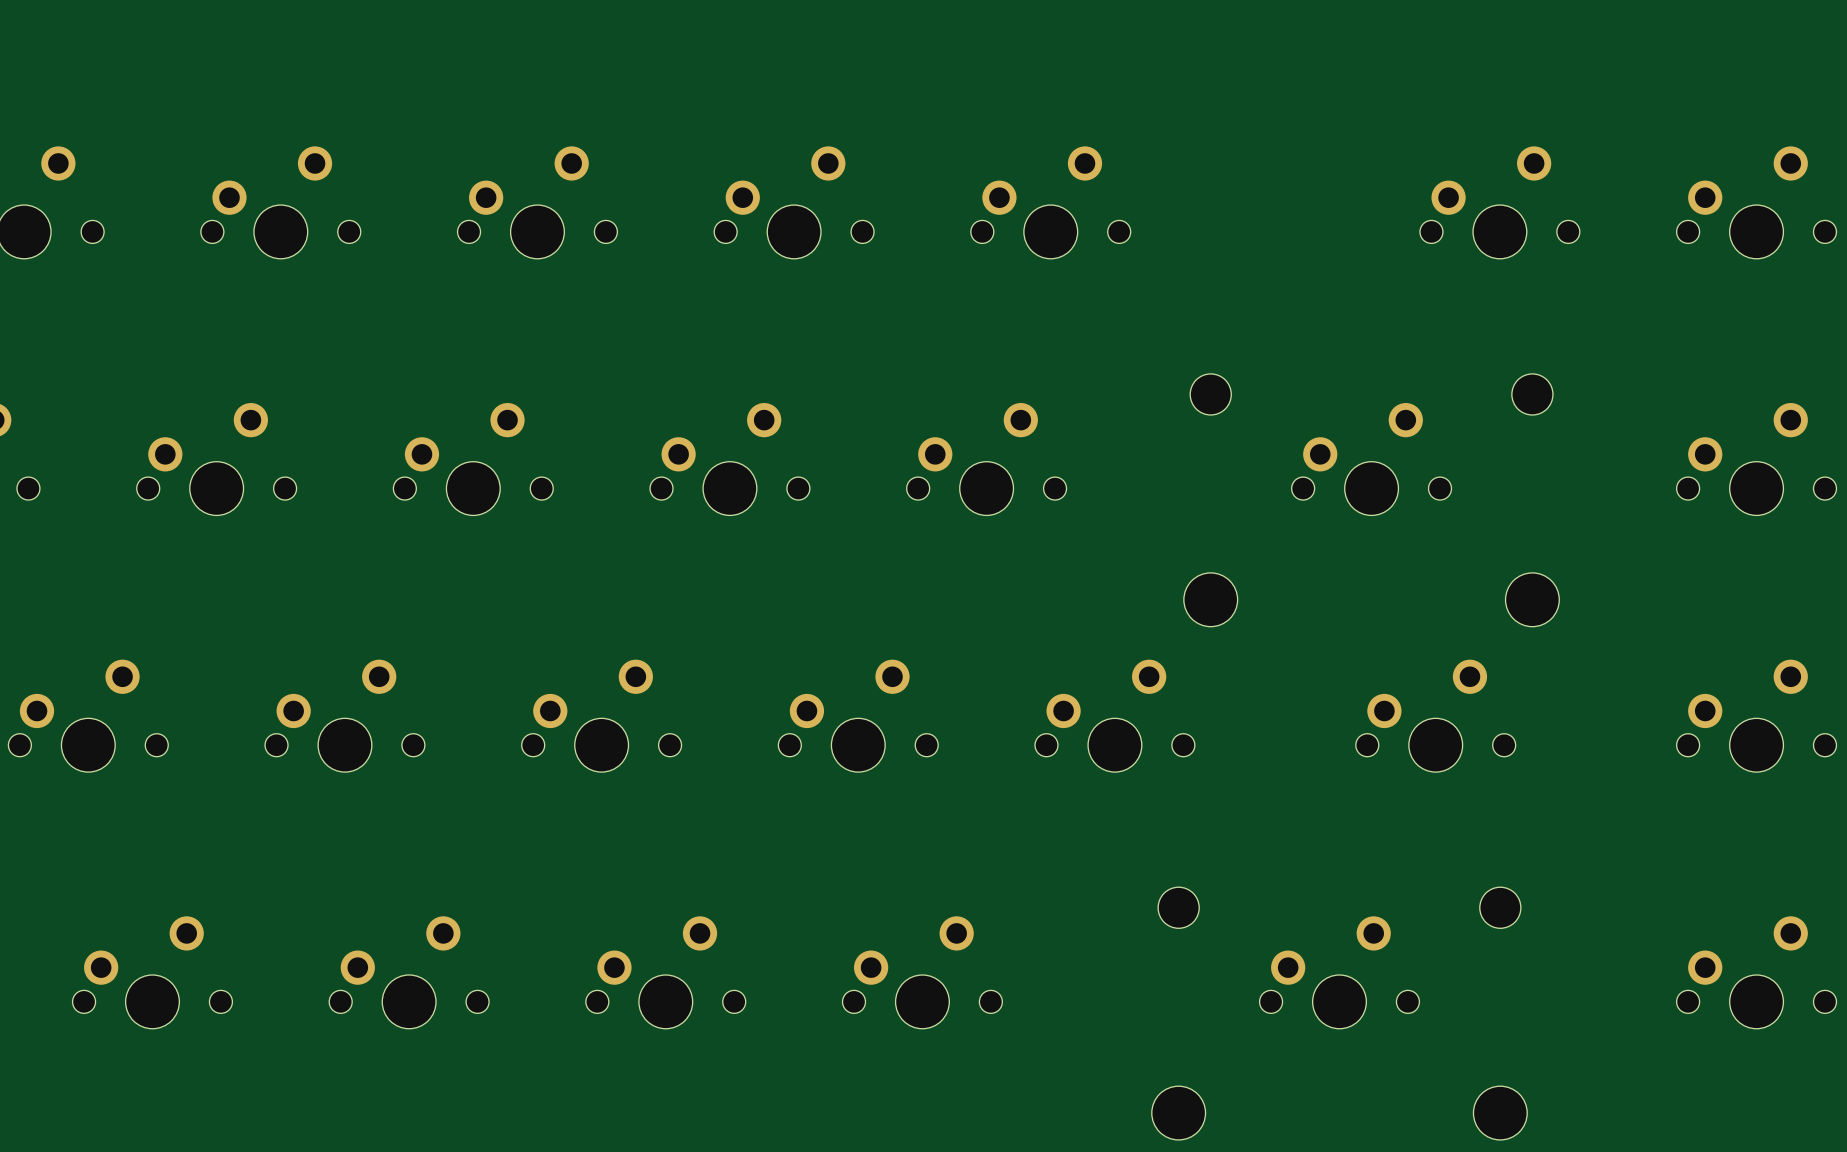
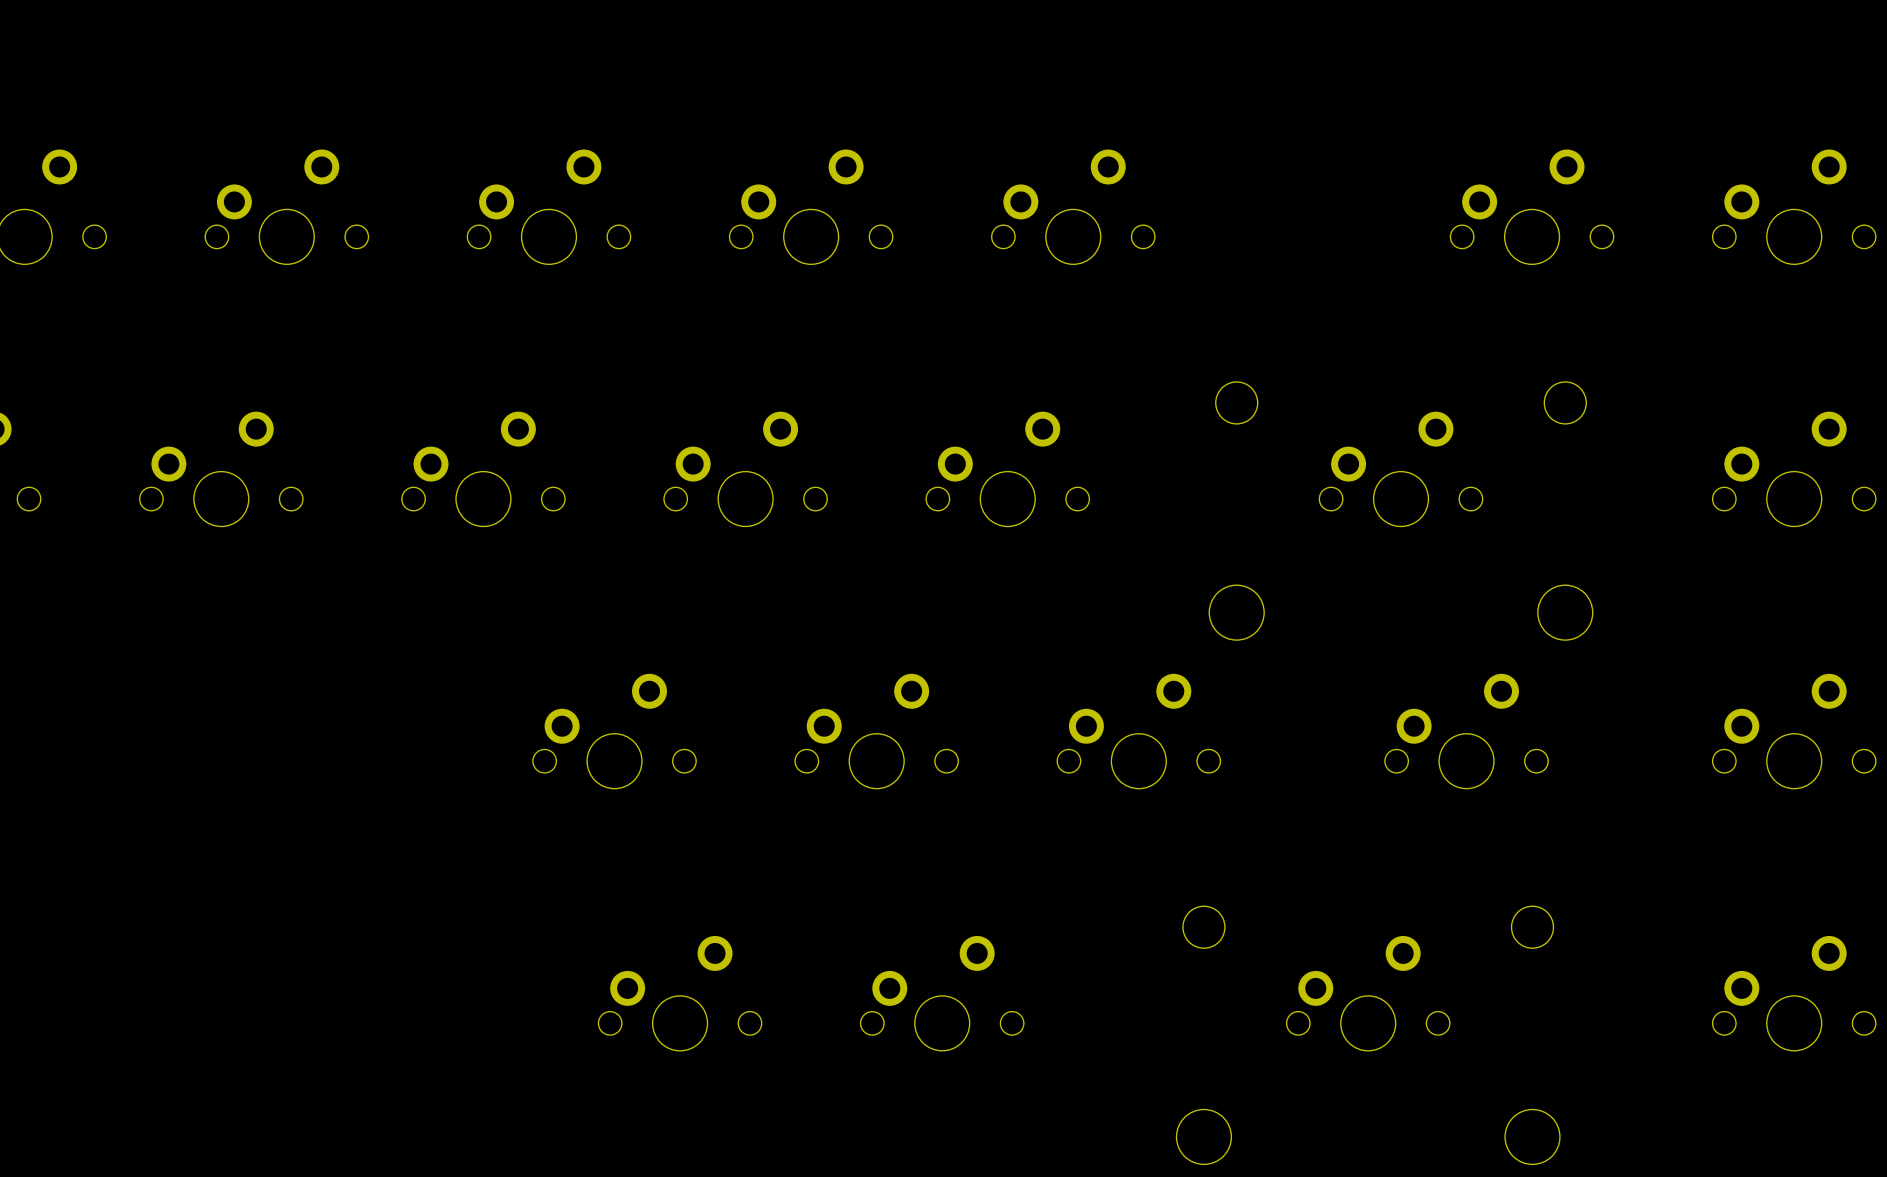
part: (88, 715) -> none
part: (344, 715) -> none
part: (152, 972) -> none
part: (409, 972) -> none

